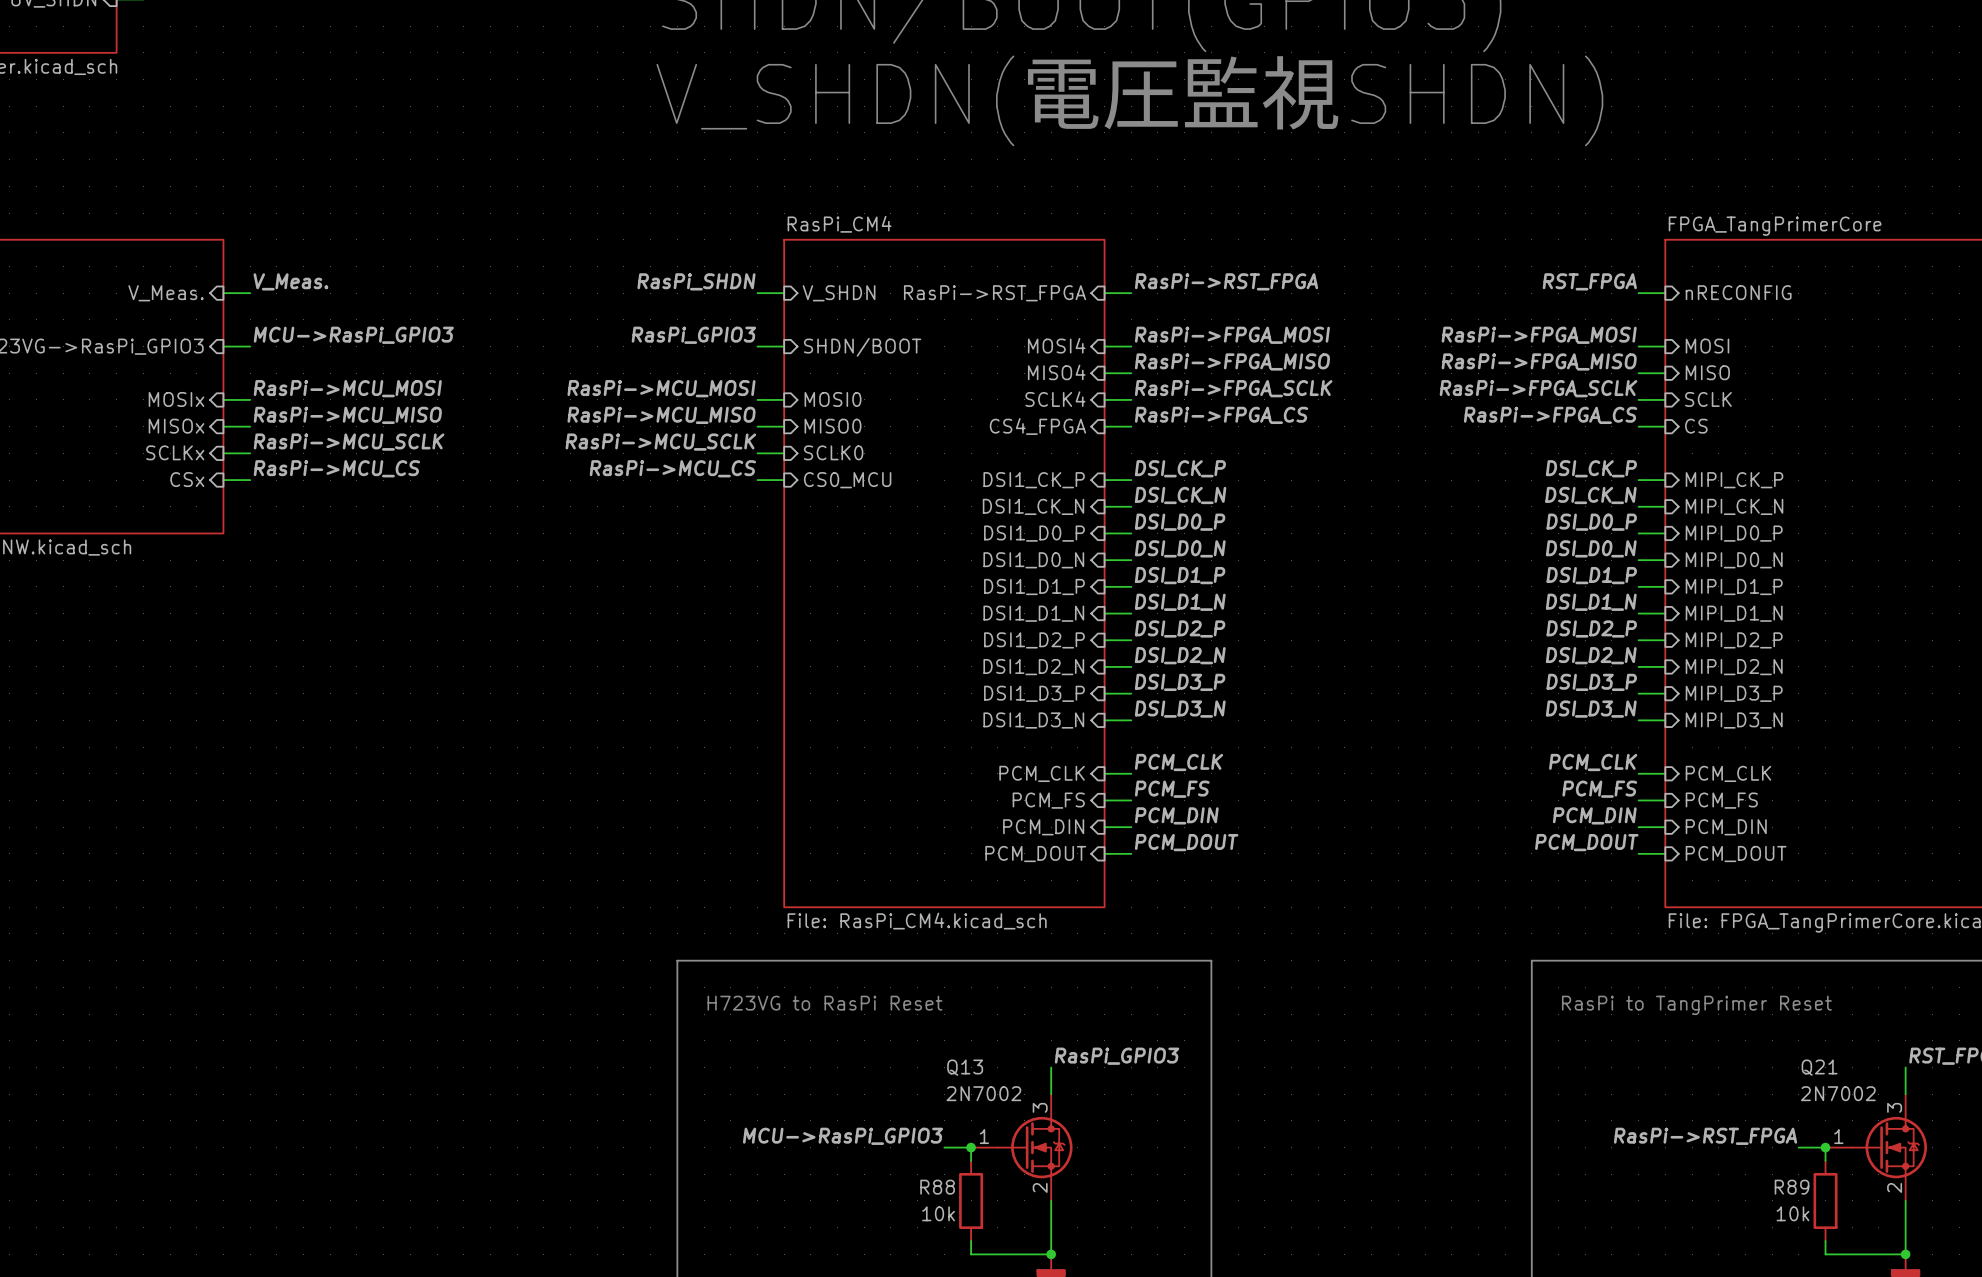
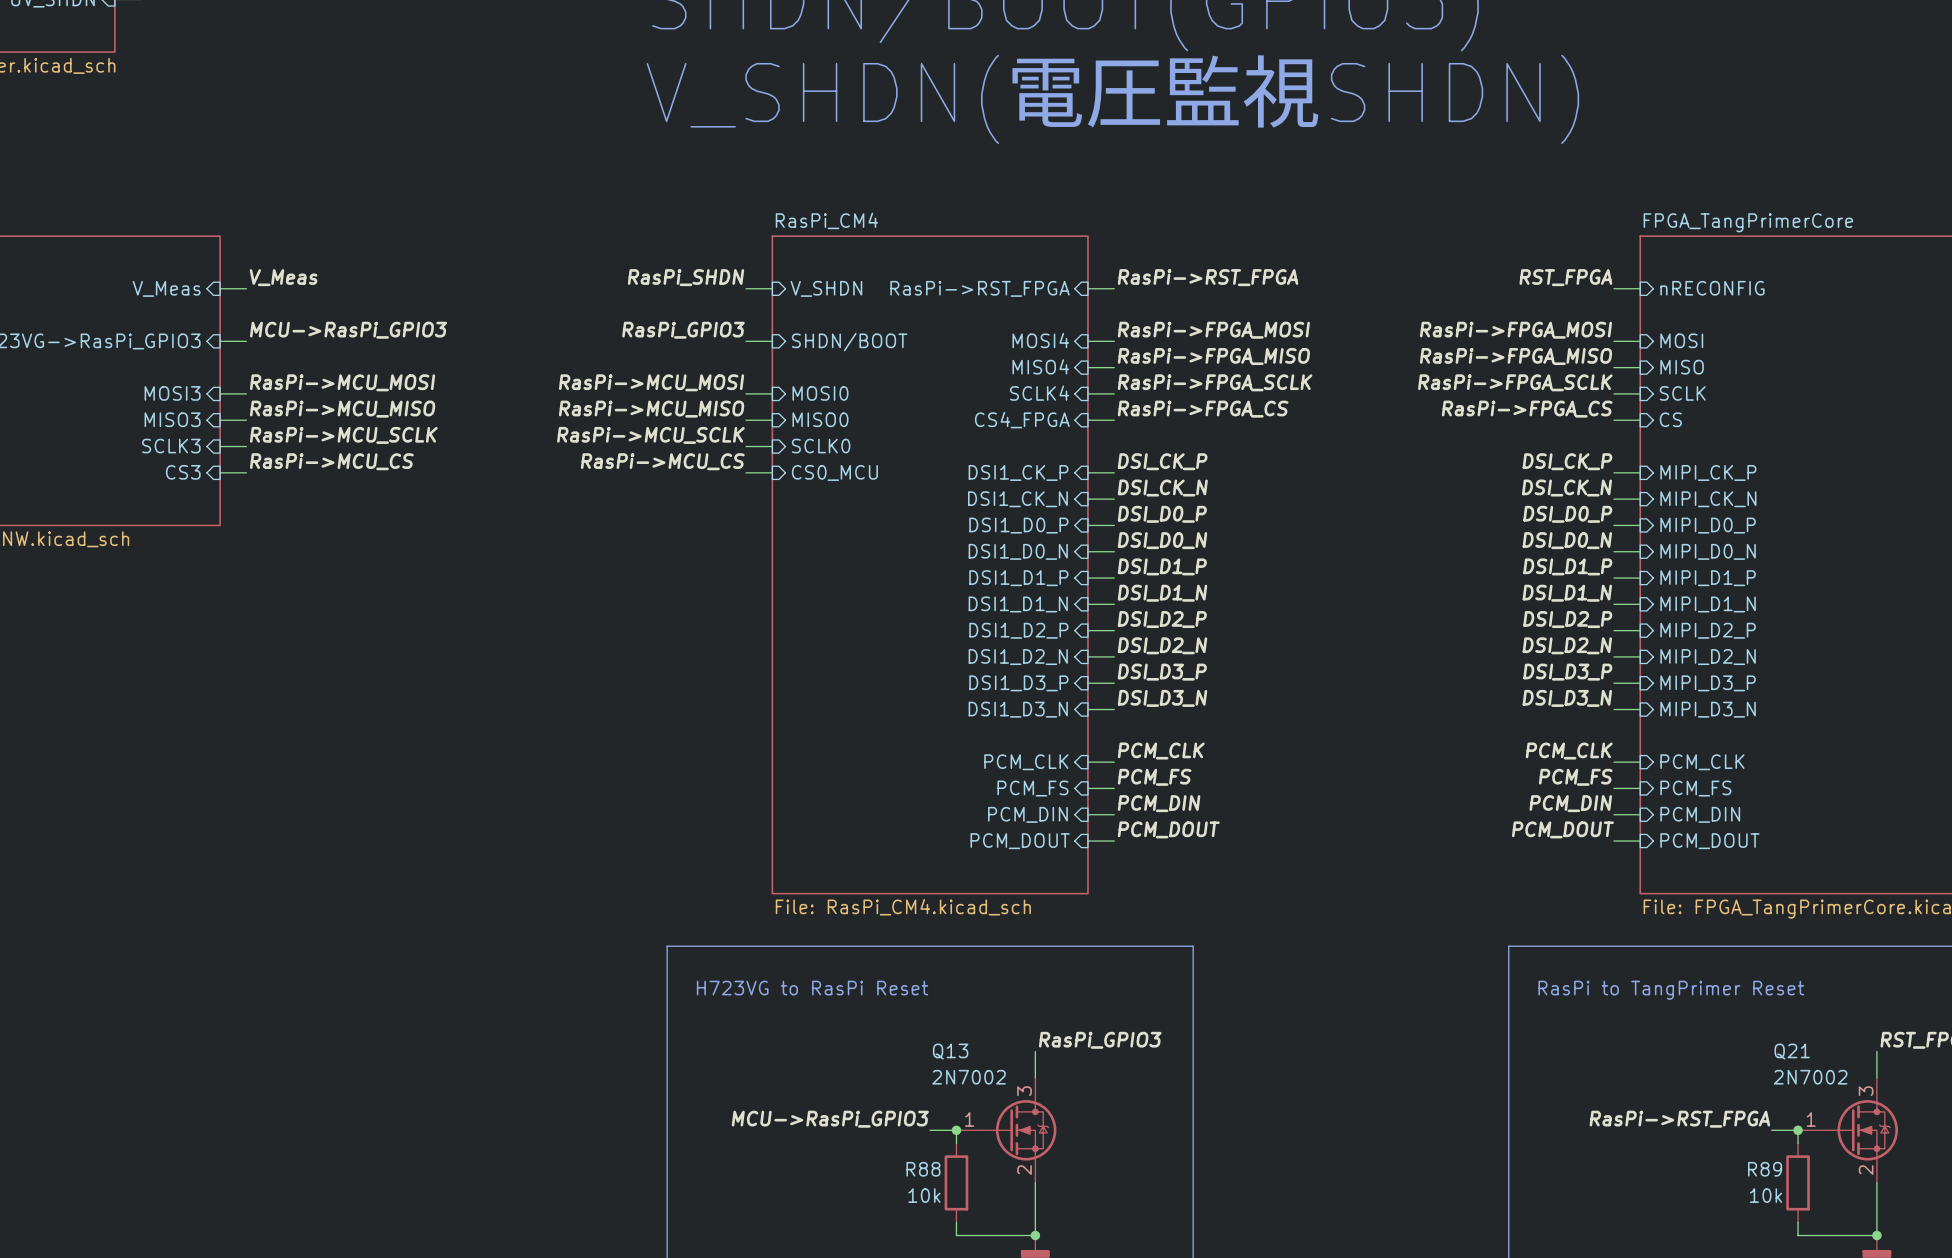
label: V_Meas. (290, 281) -> V_Meas (283, 277)
sheet pin: V_Meas. (166, 293) -> V_Meas (166, 288)
sheet pin: MOSIx (176, 399) -> MOSI3 (172, 393)
sheet pin: MISOx (176, 426) -> MISO3 (172, 419)
sheet pin: SCLKx (175, 452) -> SCLK3 (171, 446)
sheet pin: CSx (187, 479) -> CS3 (183, 472)

